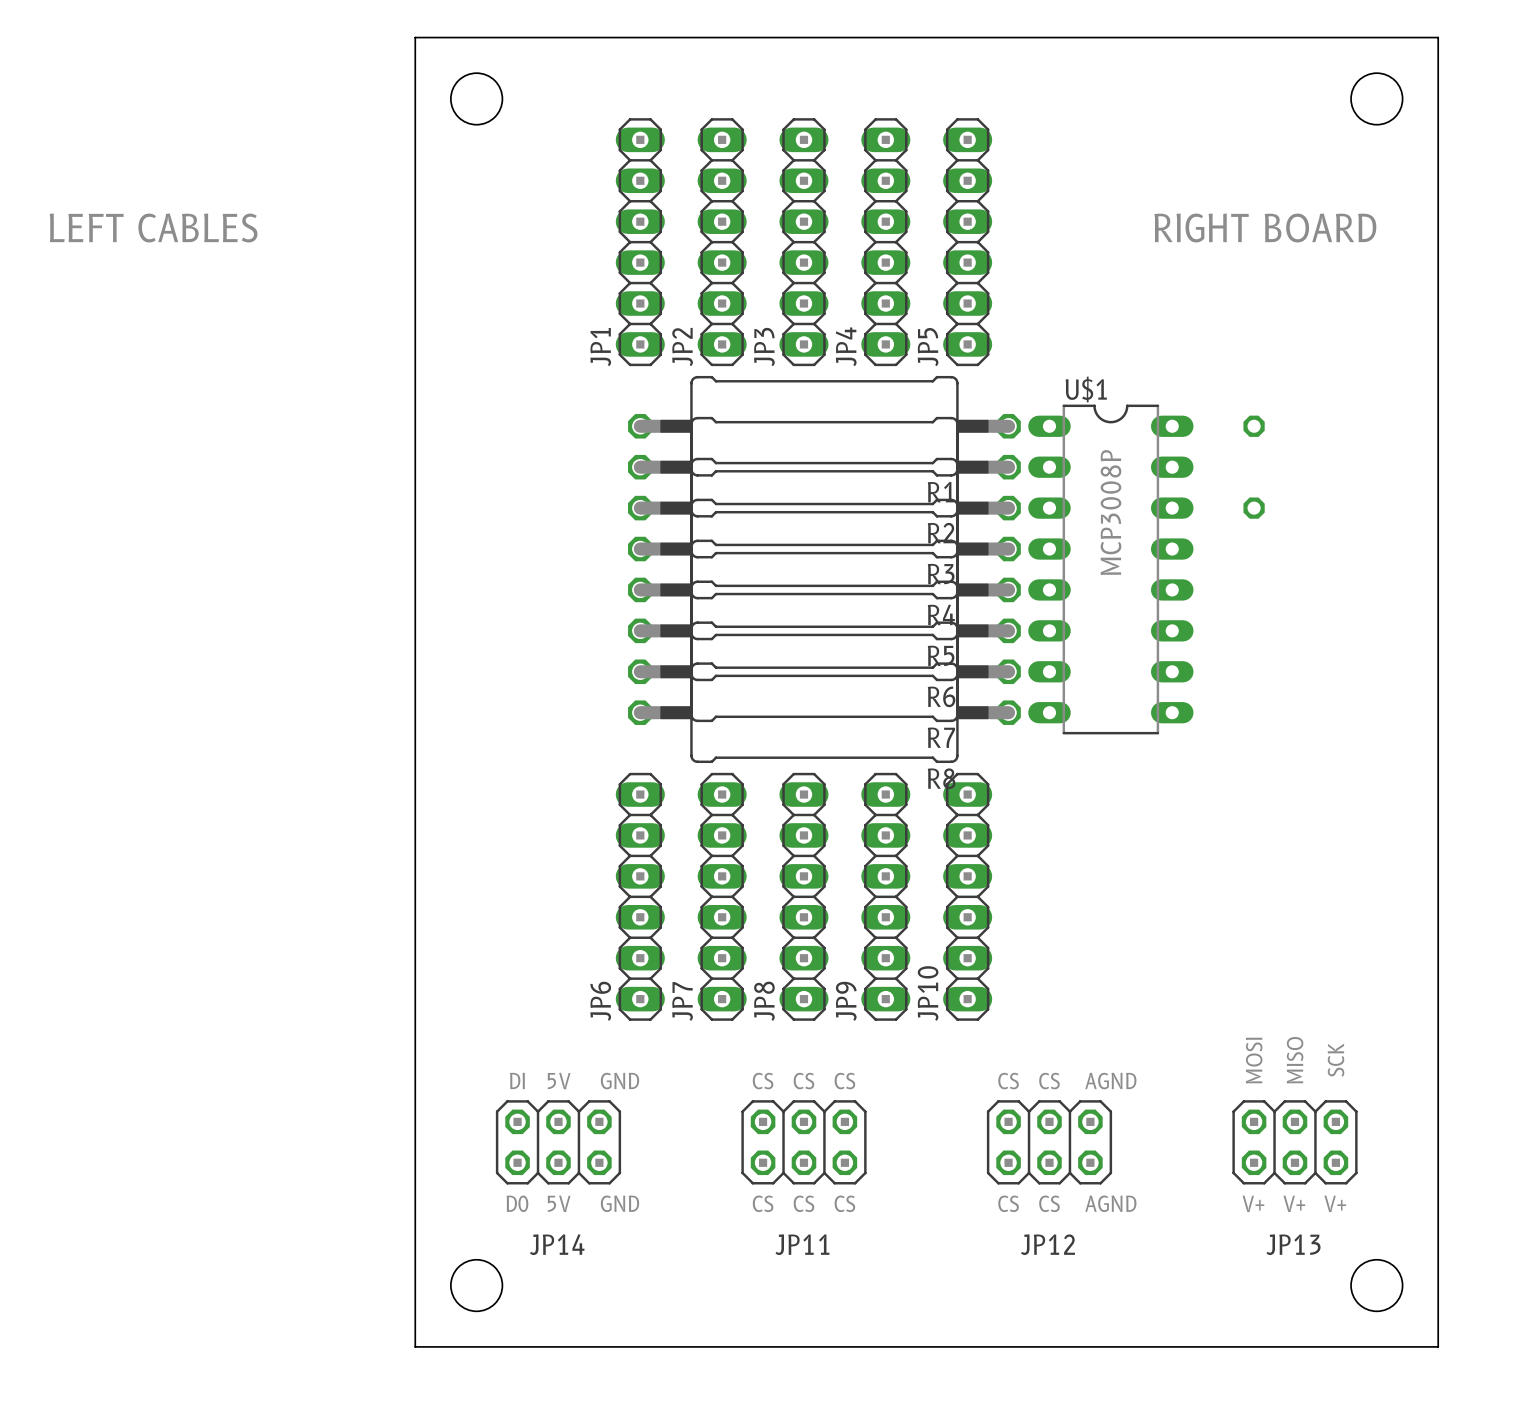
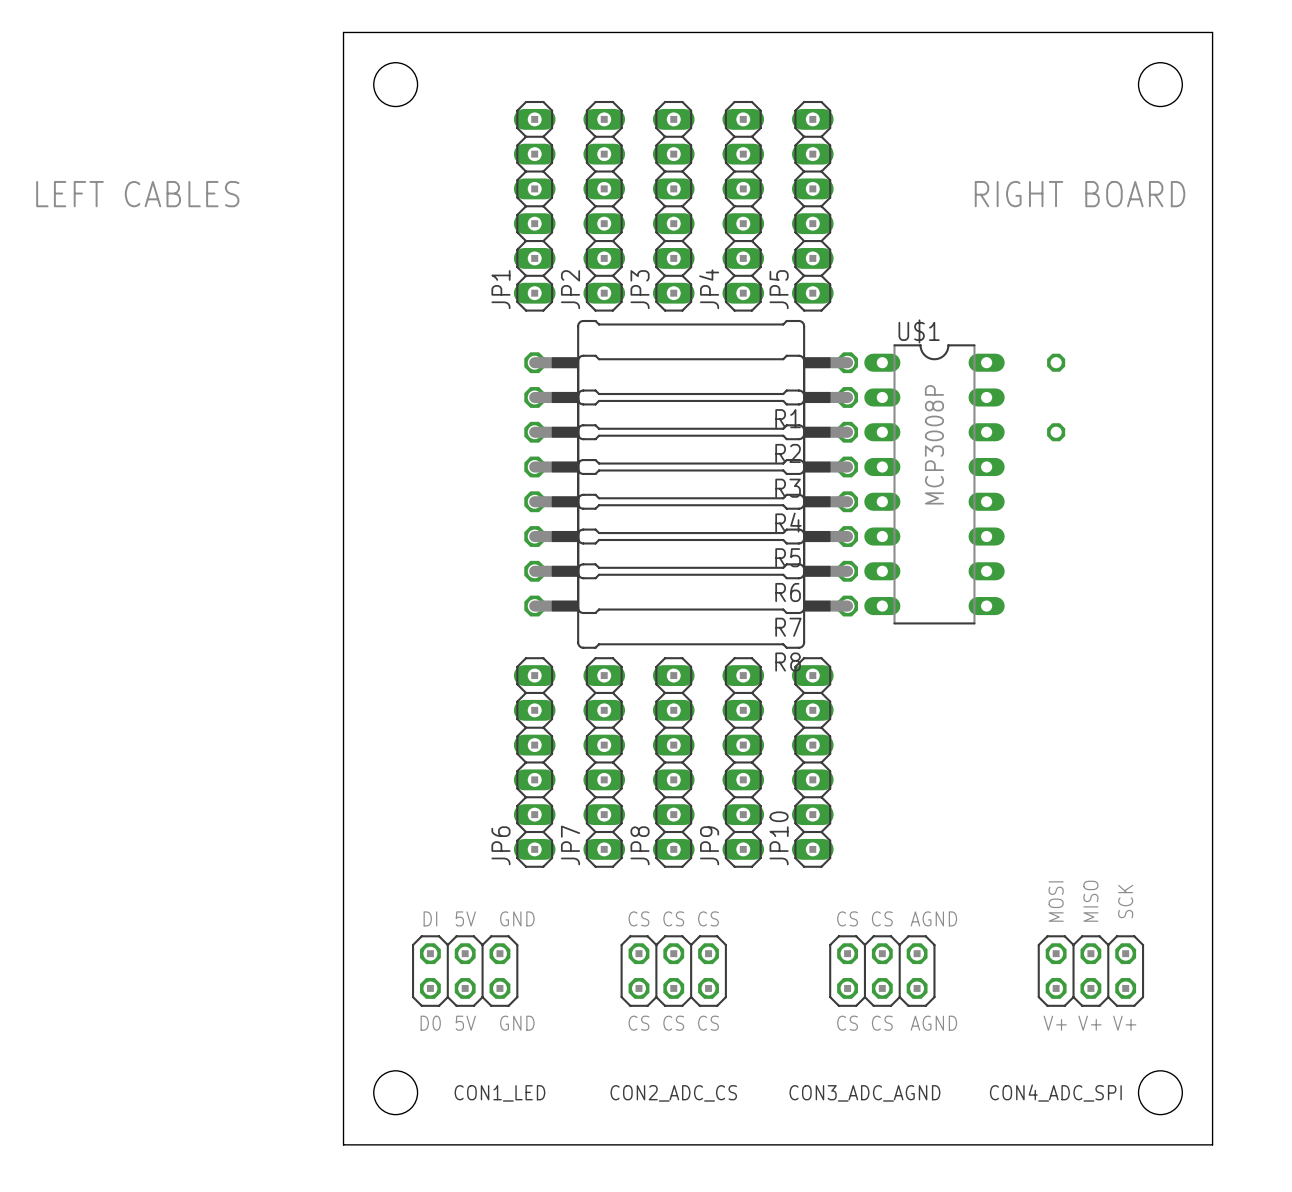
JP14 name: JP14 (557, 1244) -> CON1_LED (499, 1093)
JP11 name: JP11 (802, 1244) -> CON2_ADC_CS (673, 1093)
JP12 name: JP12 (1048, 1244) -> CON3_ADC_AGND (864, 1093)
JP13 name: JP13 (1293, 1244) -> CON4_ADC_SPI (1055, 1093)

